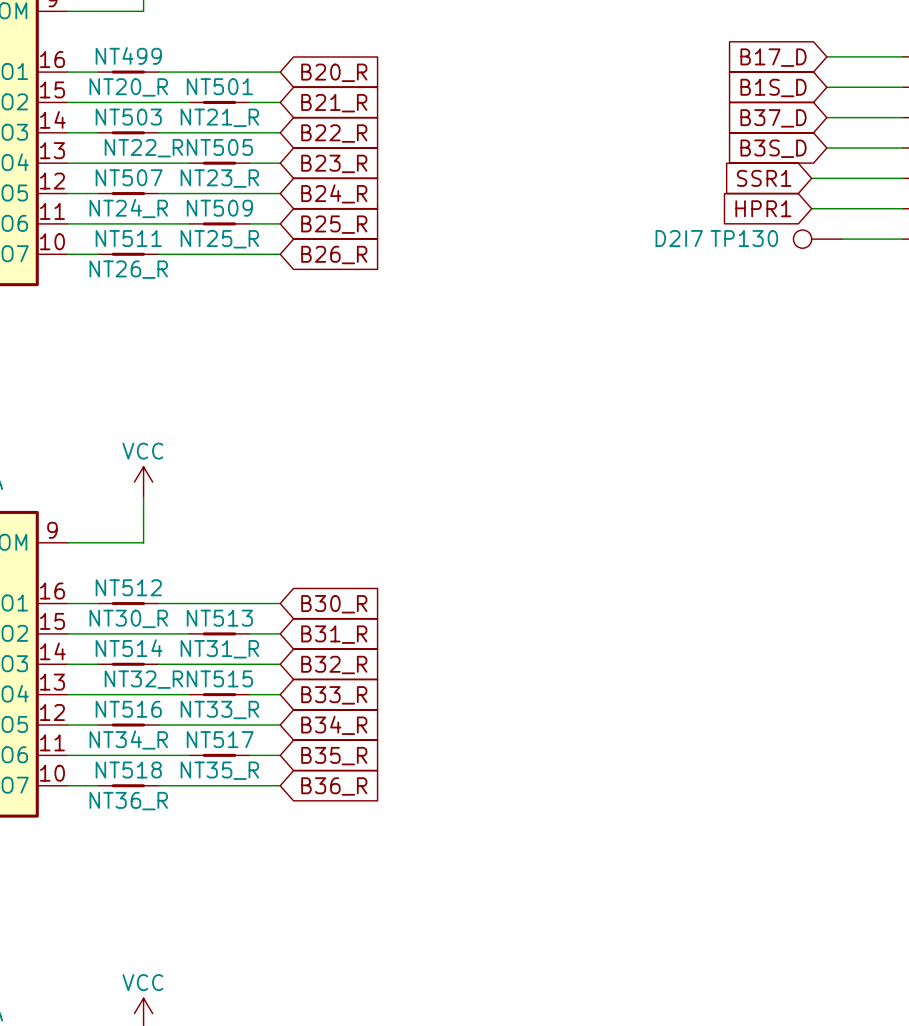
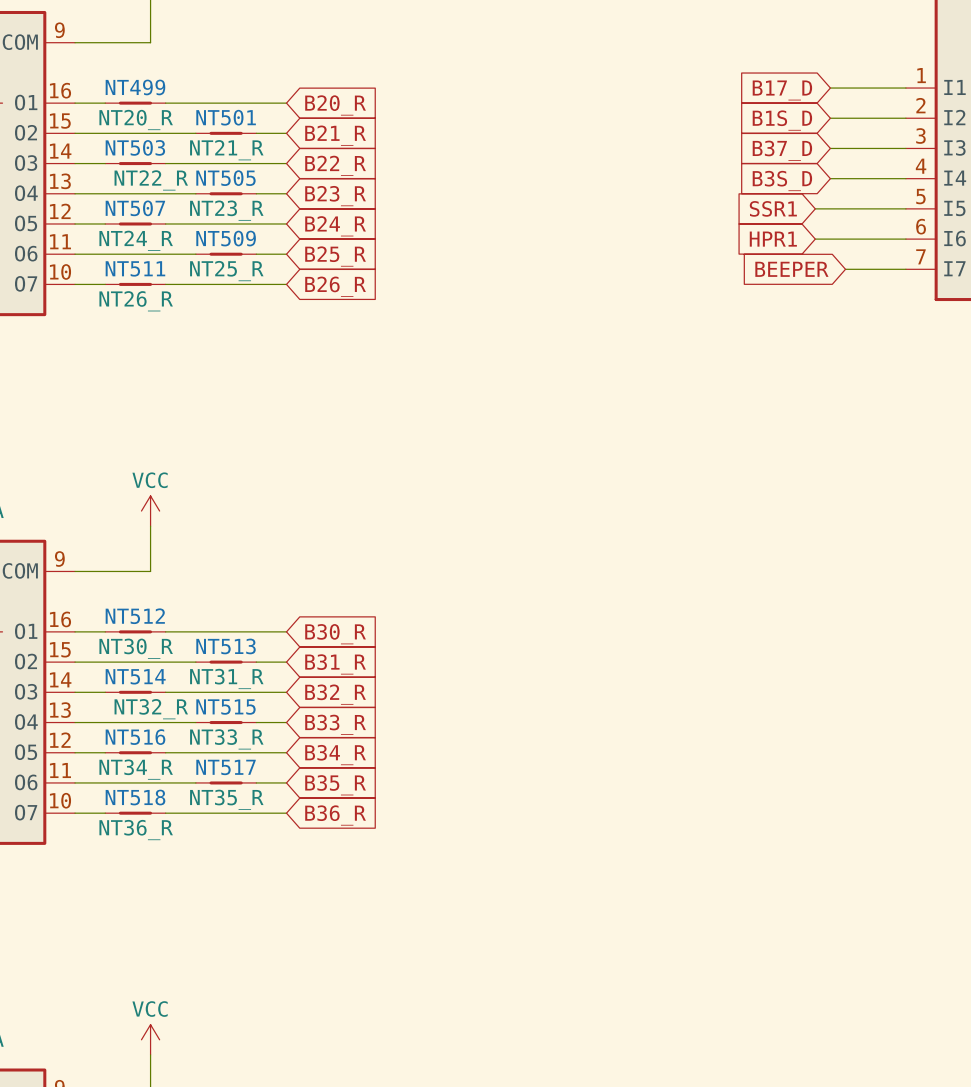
global label: none -> BEEPER (791, 269)
TP130: D2I7 (817, 239) -> none

